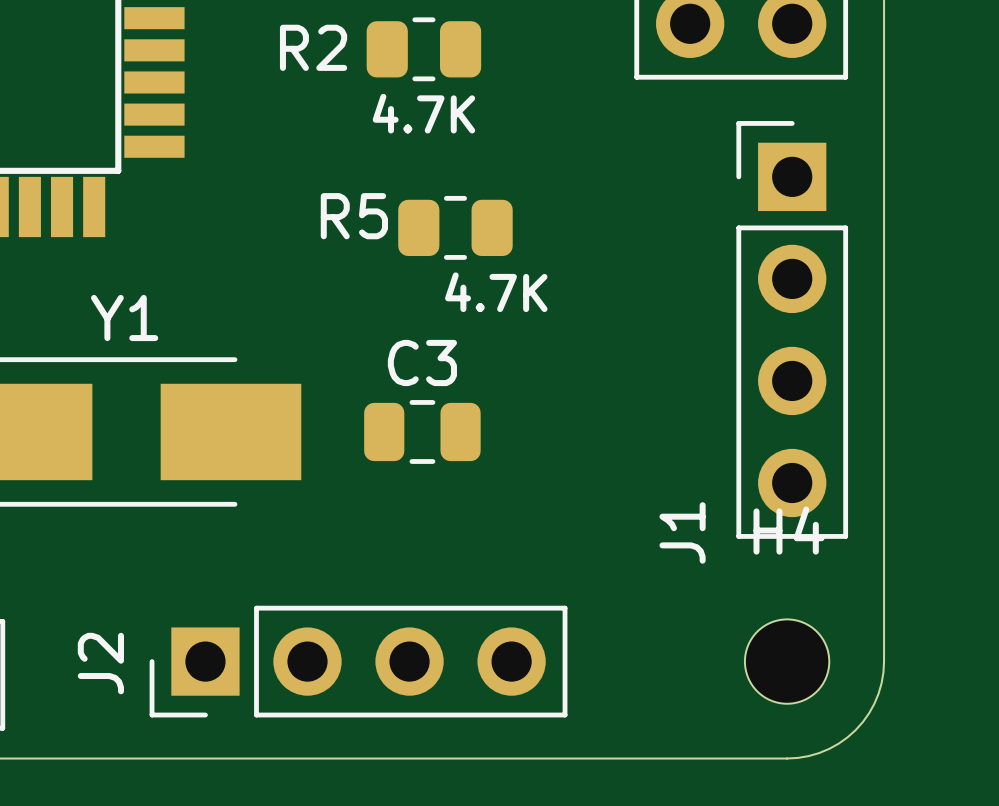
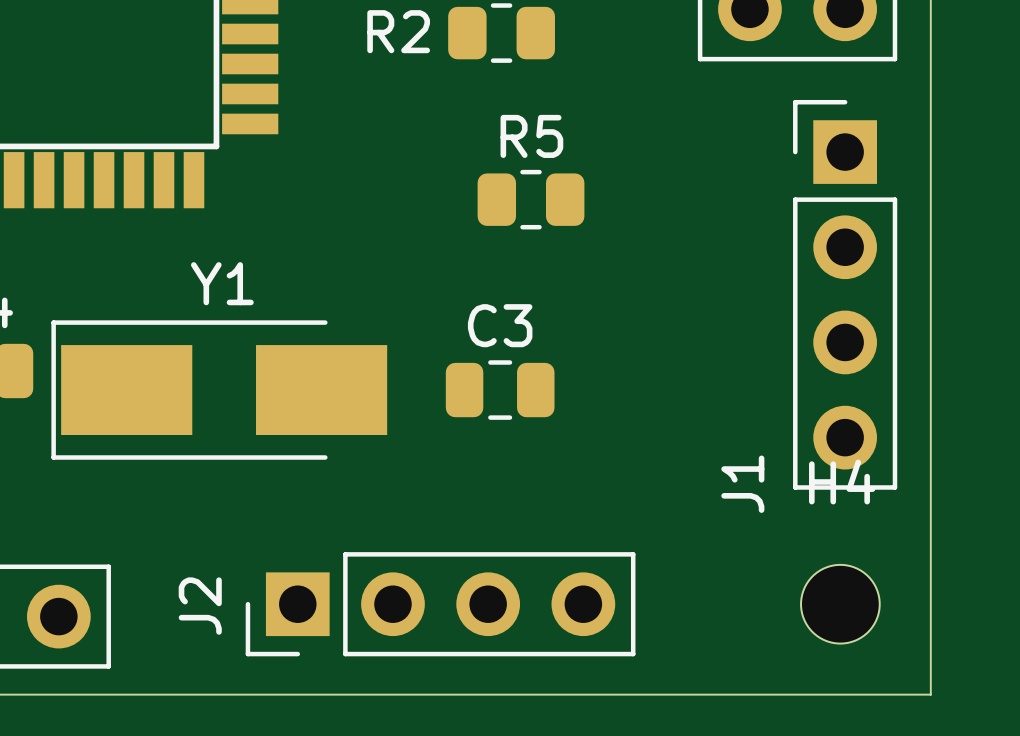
R2 value: 4.7K (423, 113) -> none
R5 name position: R5 (354, 216) -> R5 (531, 136)
R5 value: 4.7K (496, 292) -> none
board edge: (884, 661) (881, 683) (874, 703) (855, 730) (838, 743) (819, 753) (787, 758) -> (930, 604) (930, 694) (840, 694)

